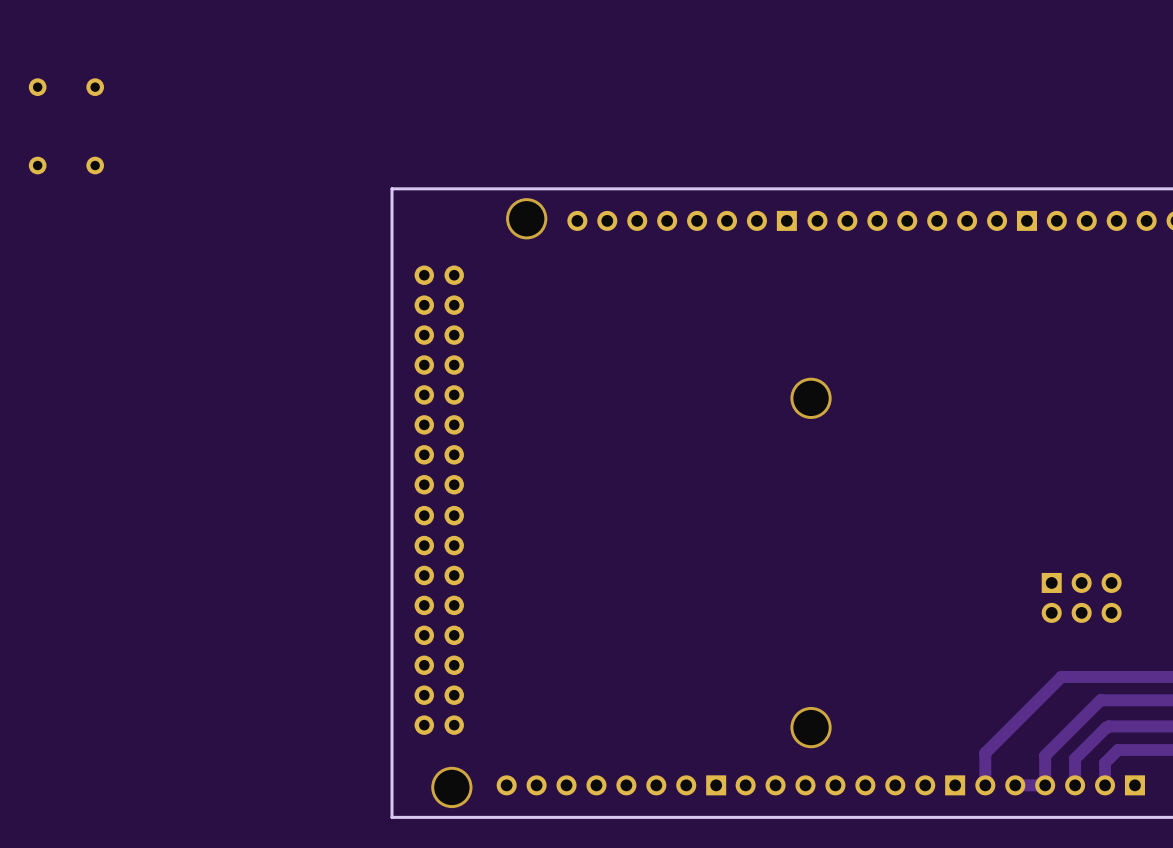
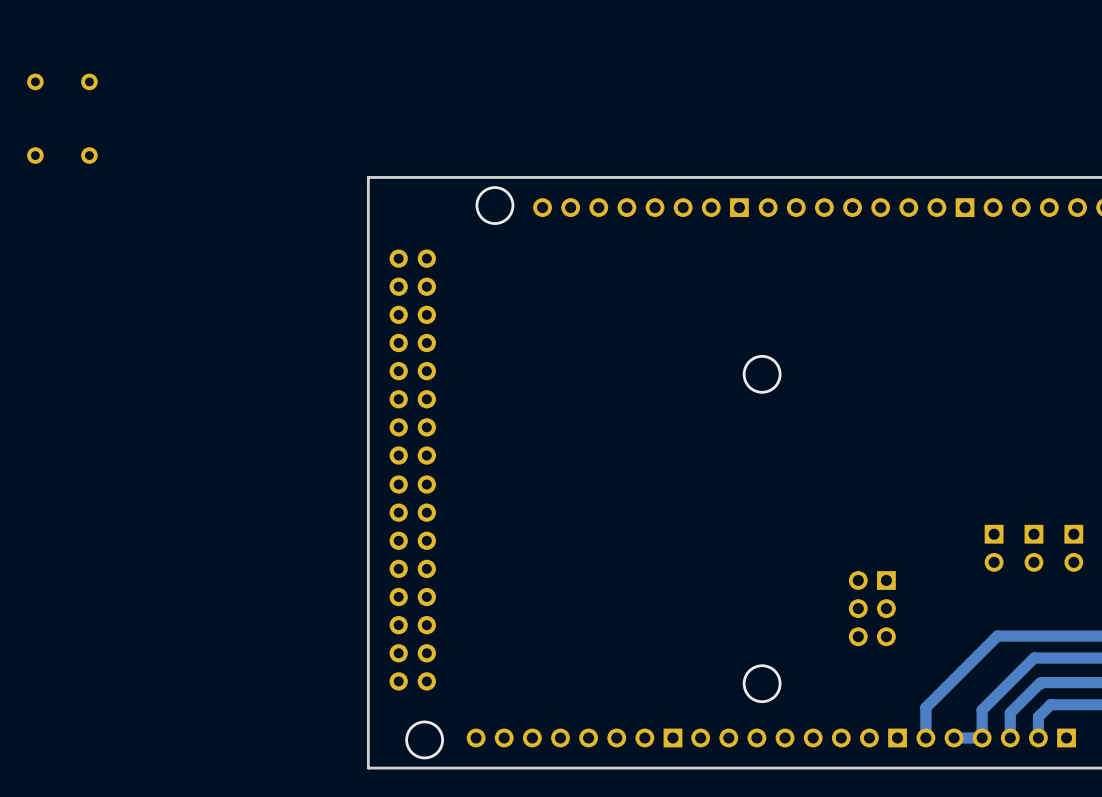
part: none -> (994, 548)
part: none -> (1033, 548)
part: none -> (1073, 548)
part rotation: 0° (1081, 597) -> 90° clockwise (872, 608)
part position: (1081, 597) -> (872, 608)

